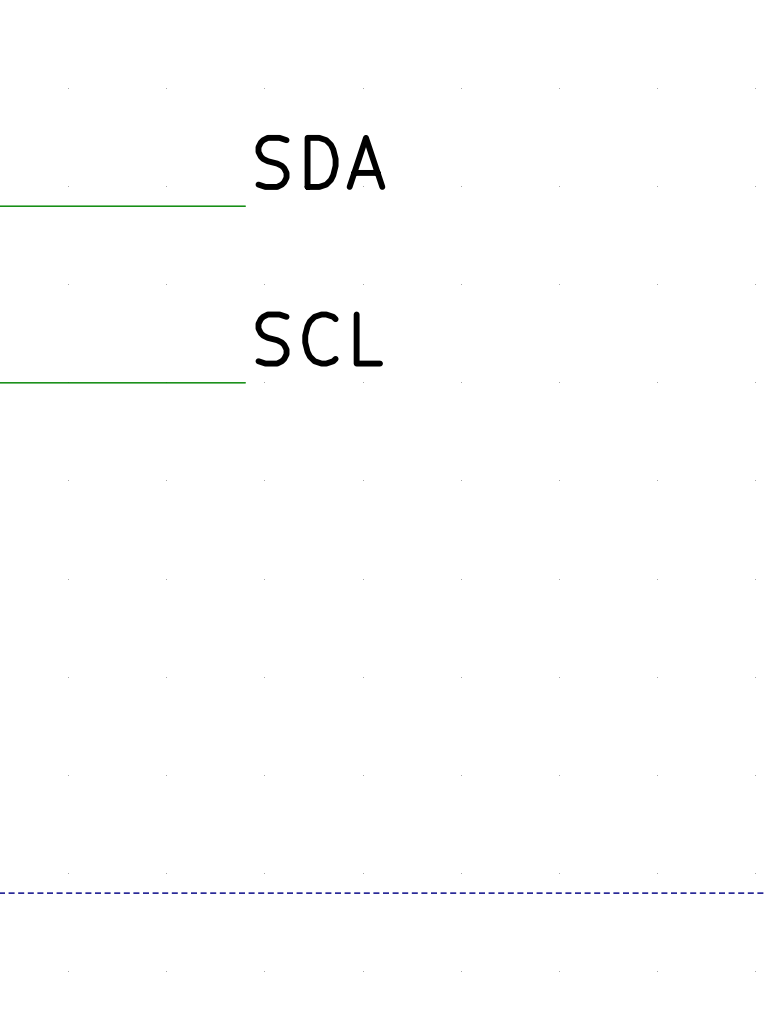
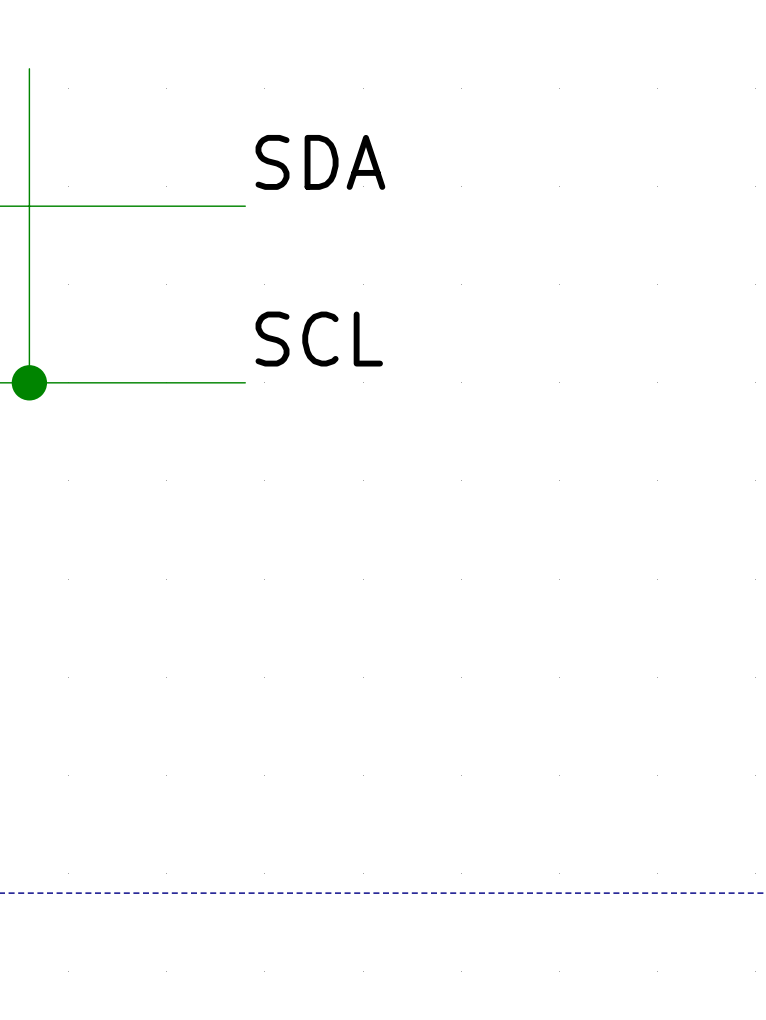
wire: none -> (29, 68) (29, 382)
junction: none -> (29, 382)

